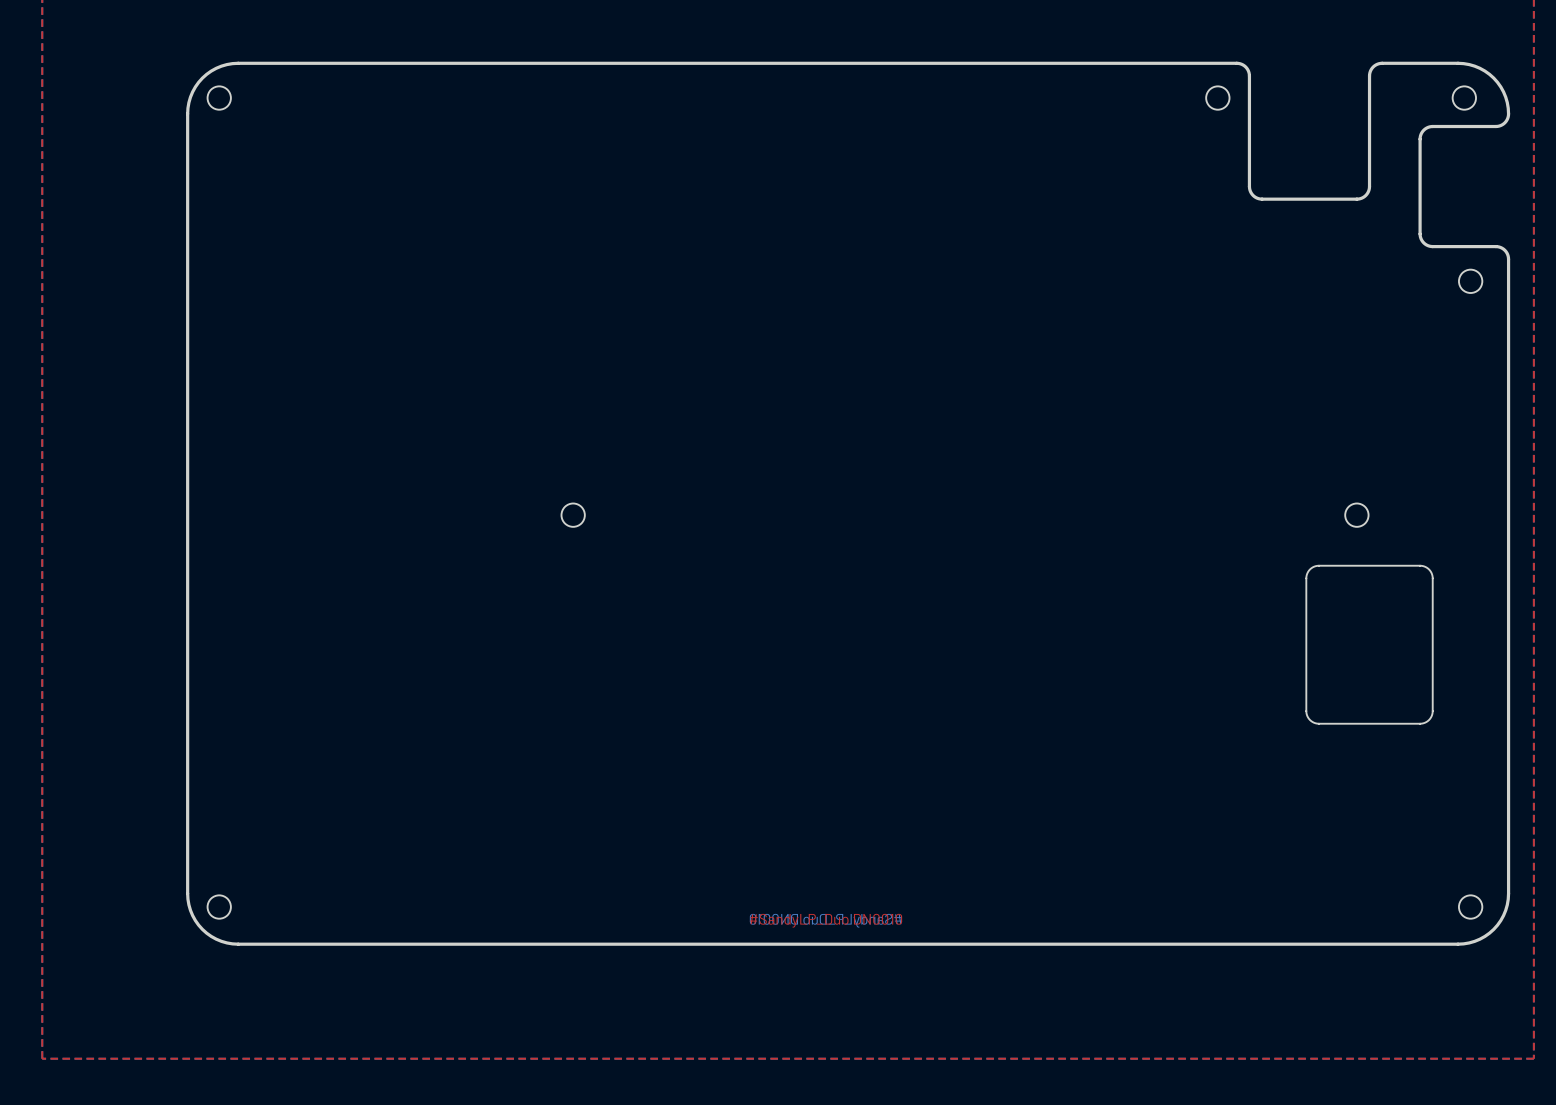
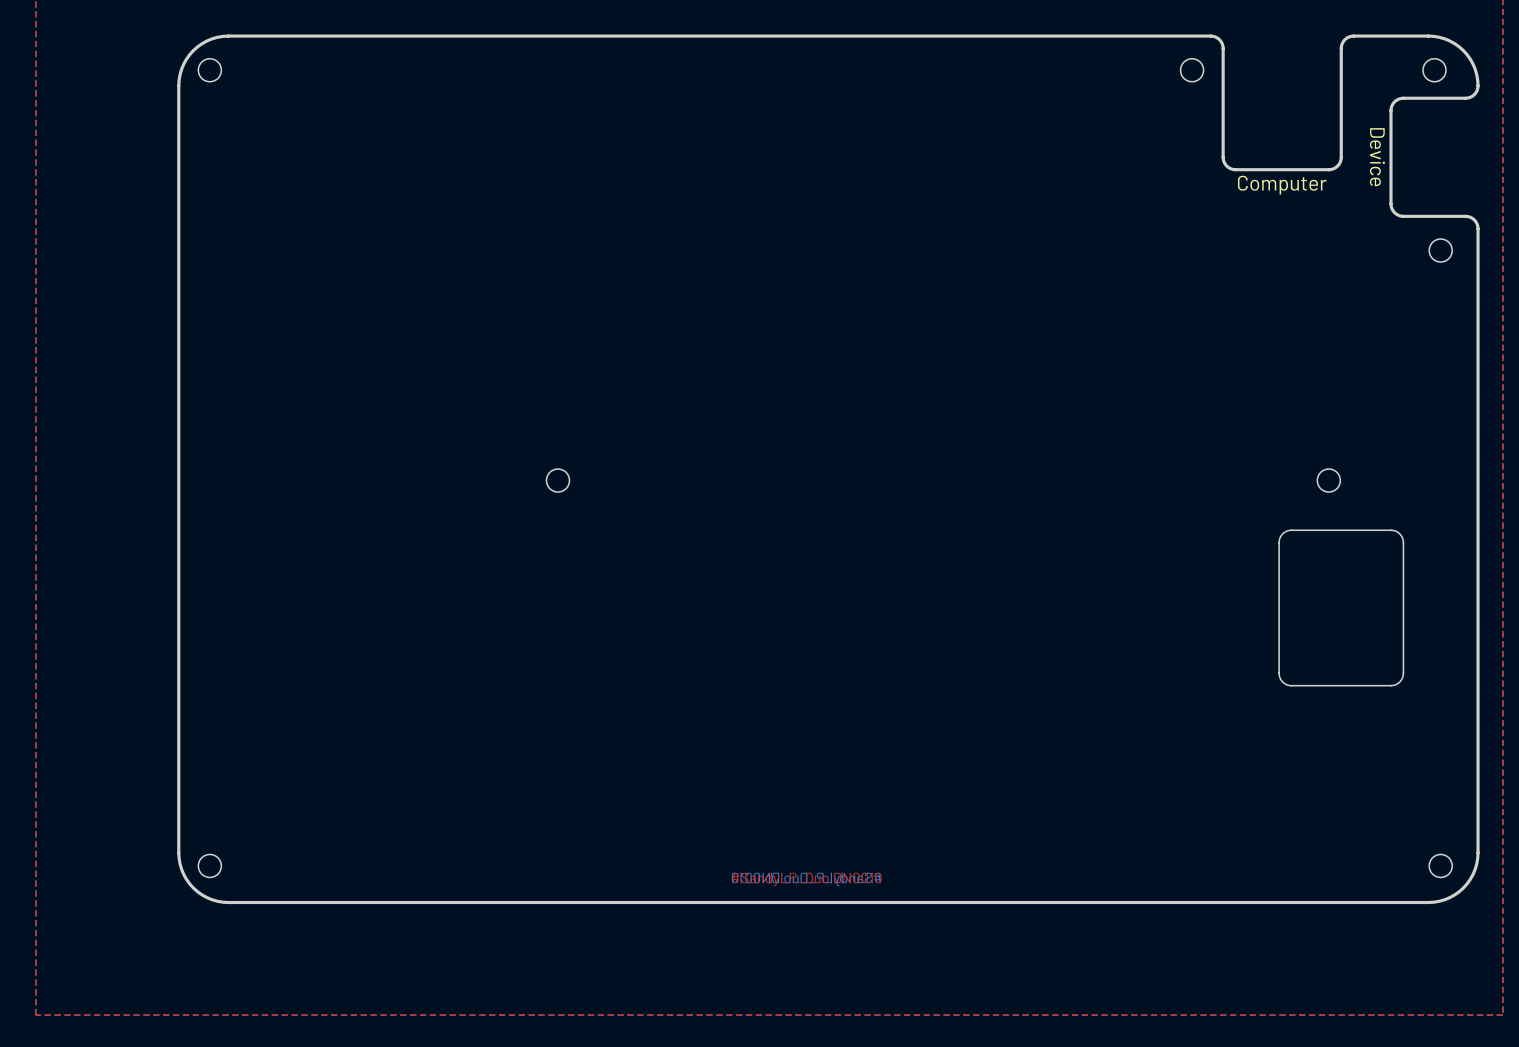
text: none -> Device (1377, 157)
text: none -> Computer (1282, 185)

